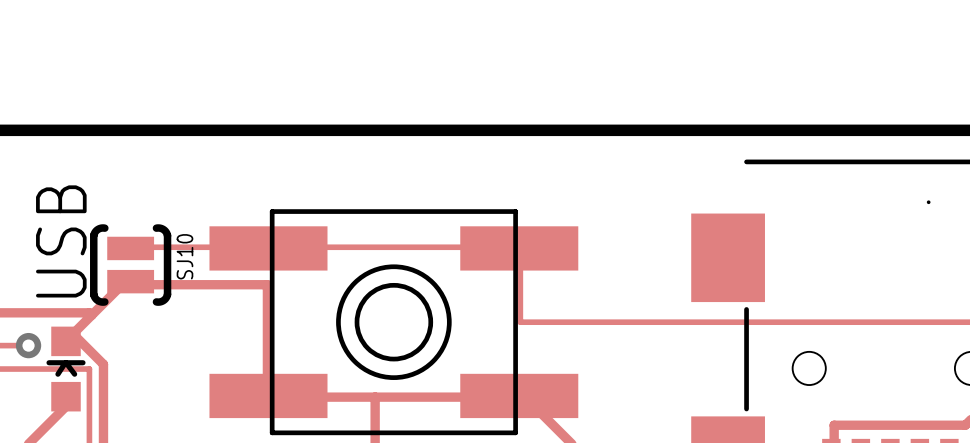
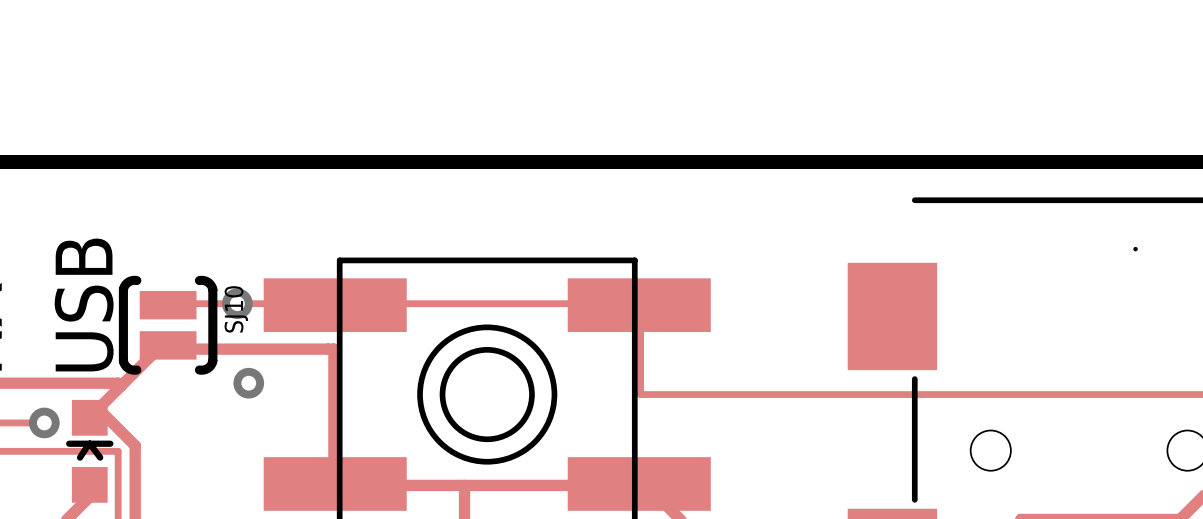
via: none -> (237, 303)
via: none -> (248, 383)

